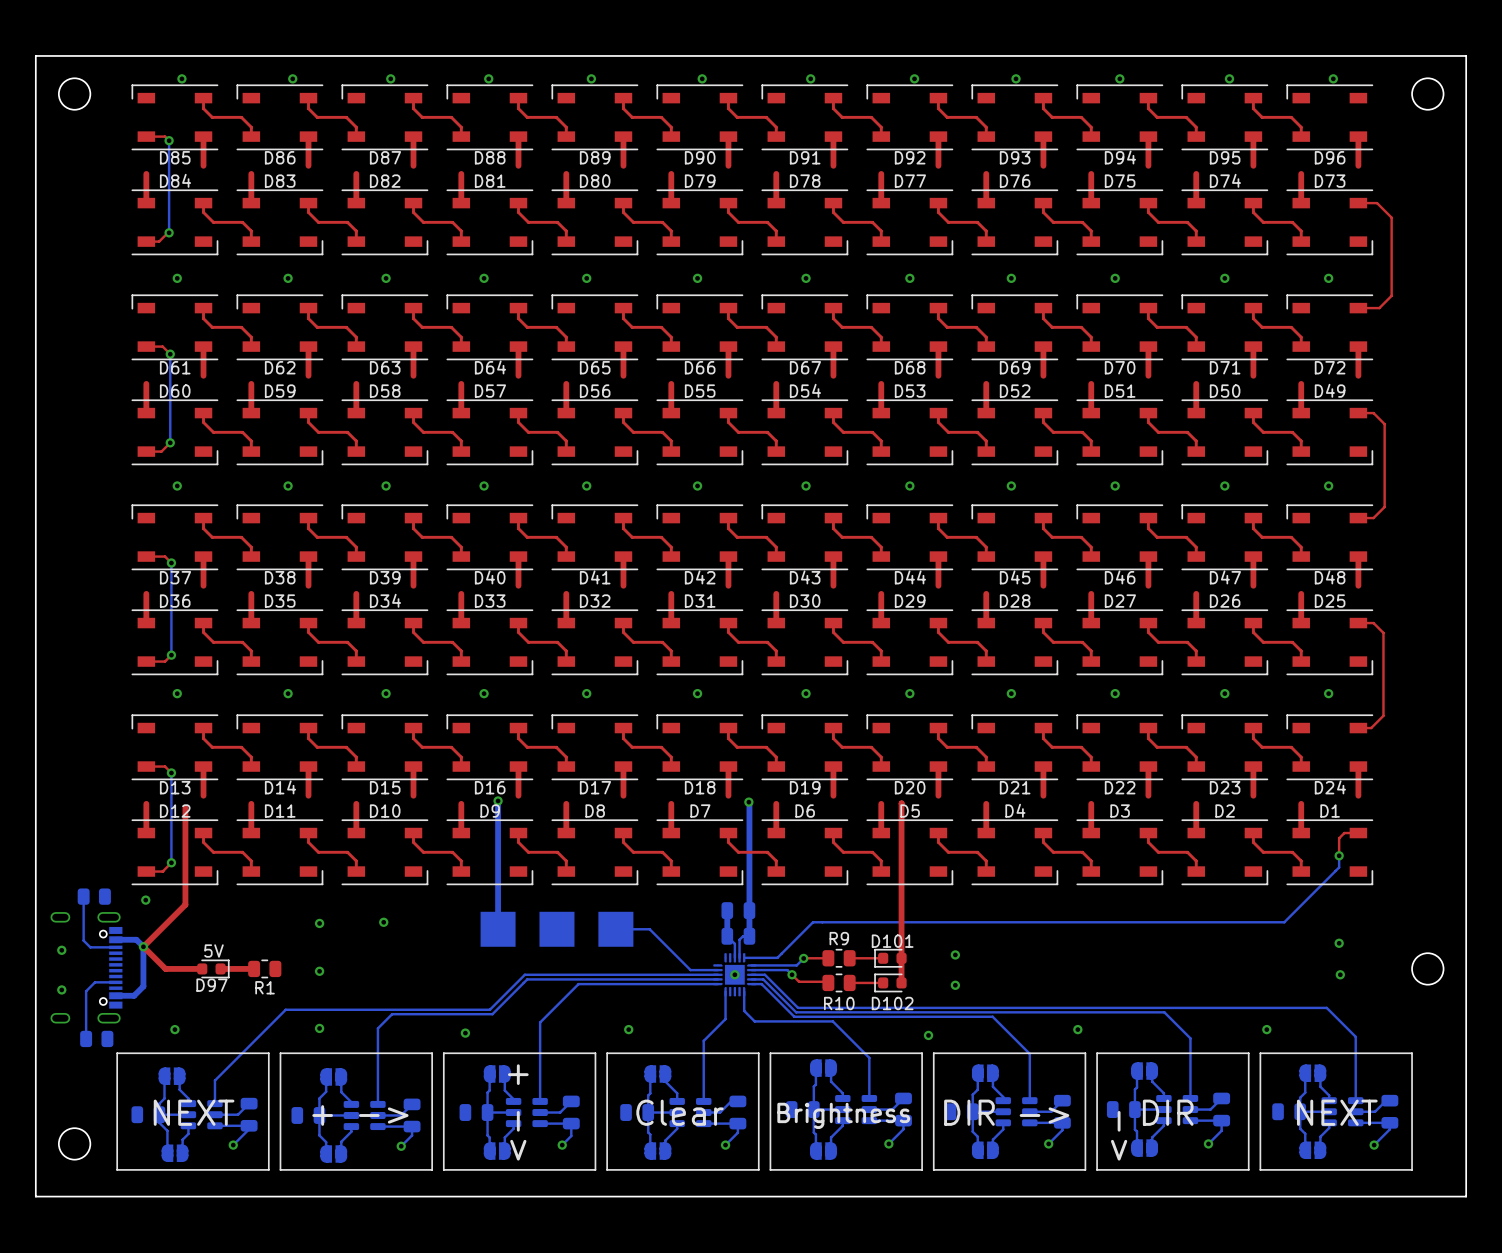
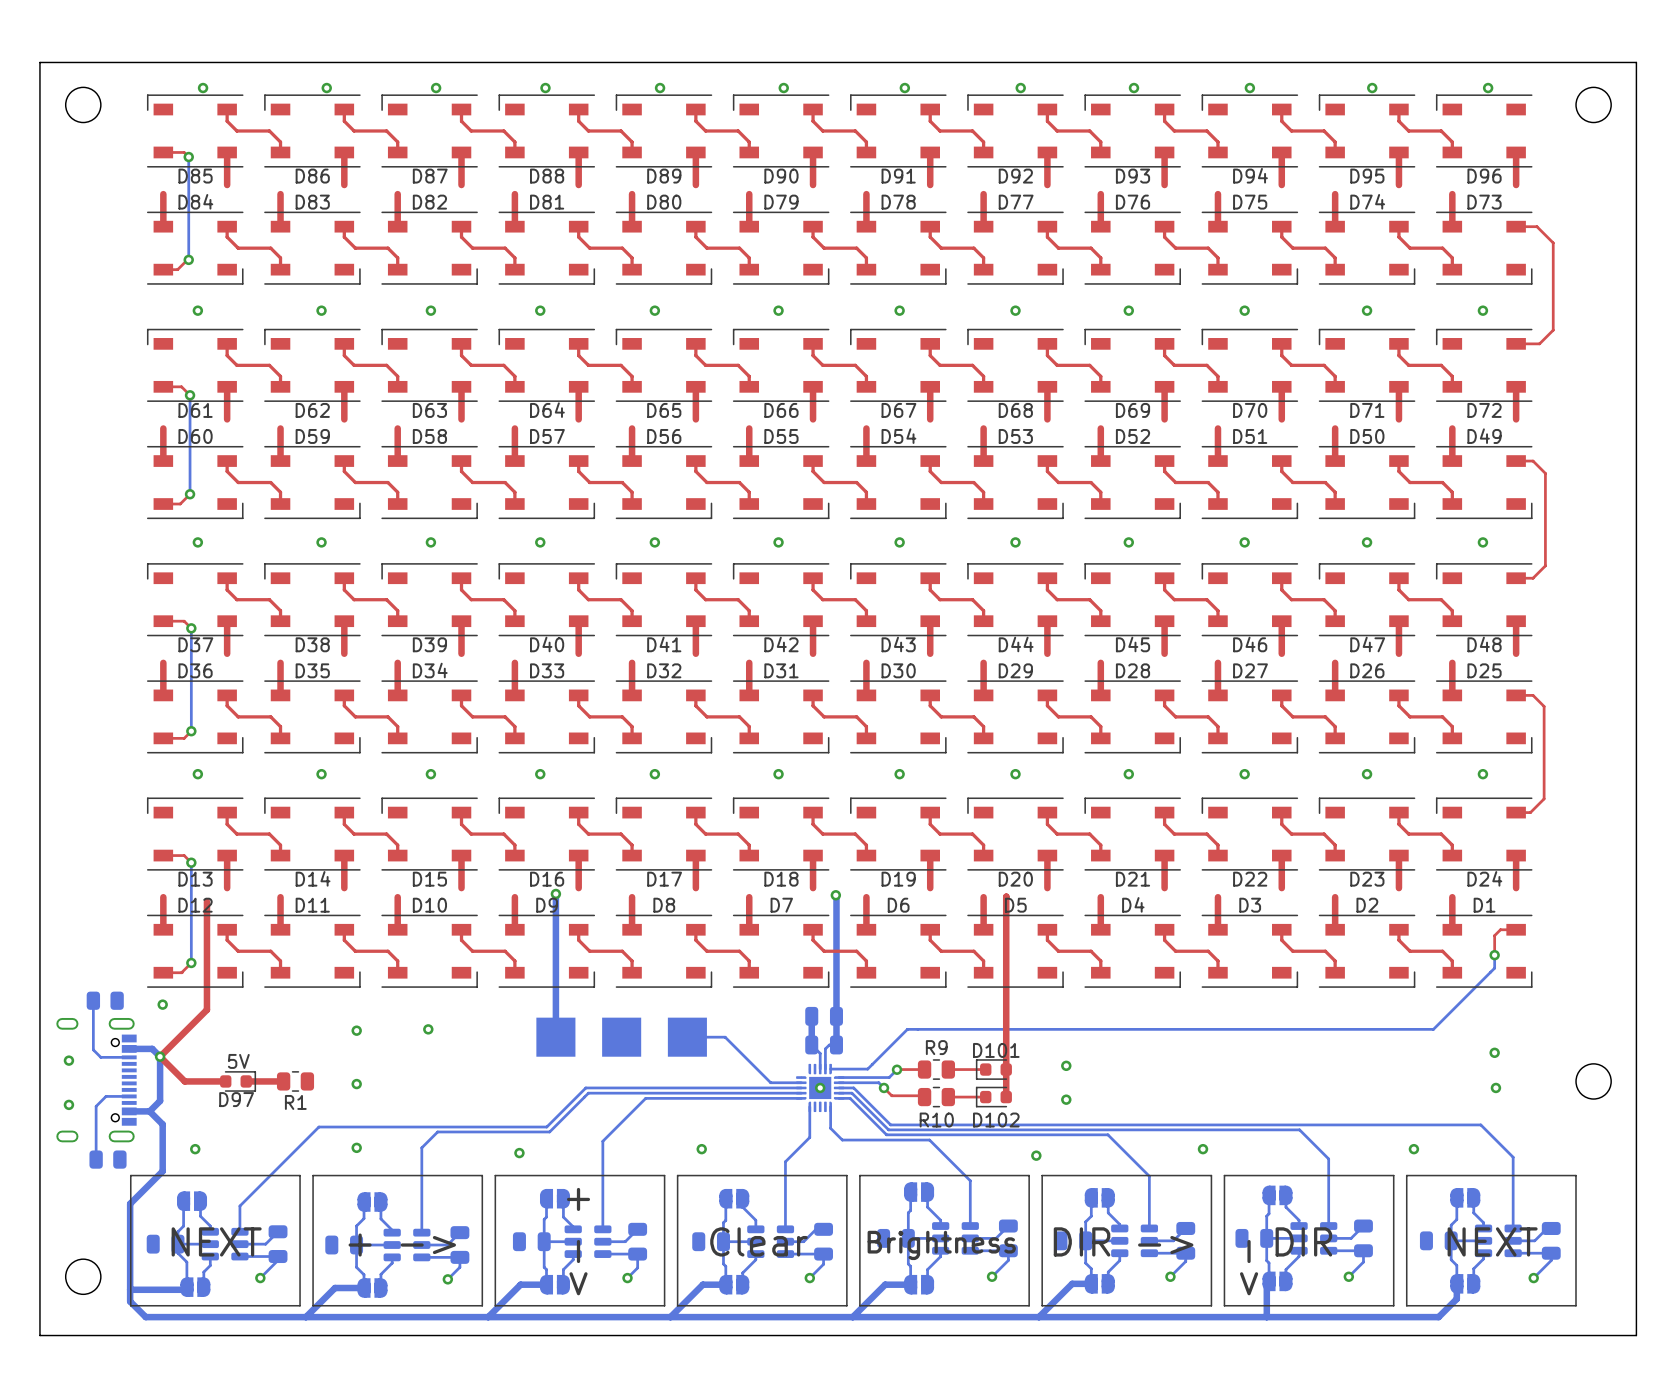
bottom track: none -> (149, 1111) (162, 1124) (162, 1171) (130, 1203) (130, 1301) (145, 1317) (1438, 1317) (1456, 1298) (1456, 1283)
bottom track: none -> (1269, 1281) (1266, 1283) (1266, 1317)
bottom track: none -> (1091, 1283) (1072, 1283) (1038, 1317)
bottom track: none -> (546, 1284) (520, 1284) (488, 1317)
bottom track: none -> (725, 1284) (702, 1284) (670, 1317)
bottom track: none -> (910, 1284) (885, 1284) (852, 1317)
bottom track: none -> (186, 1287) (184, 1289) (130, 1289)
bottom track: none -> (364, 1288) (335, 1288) (305, 1317)

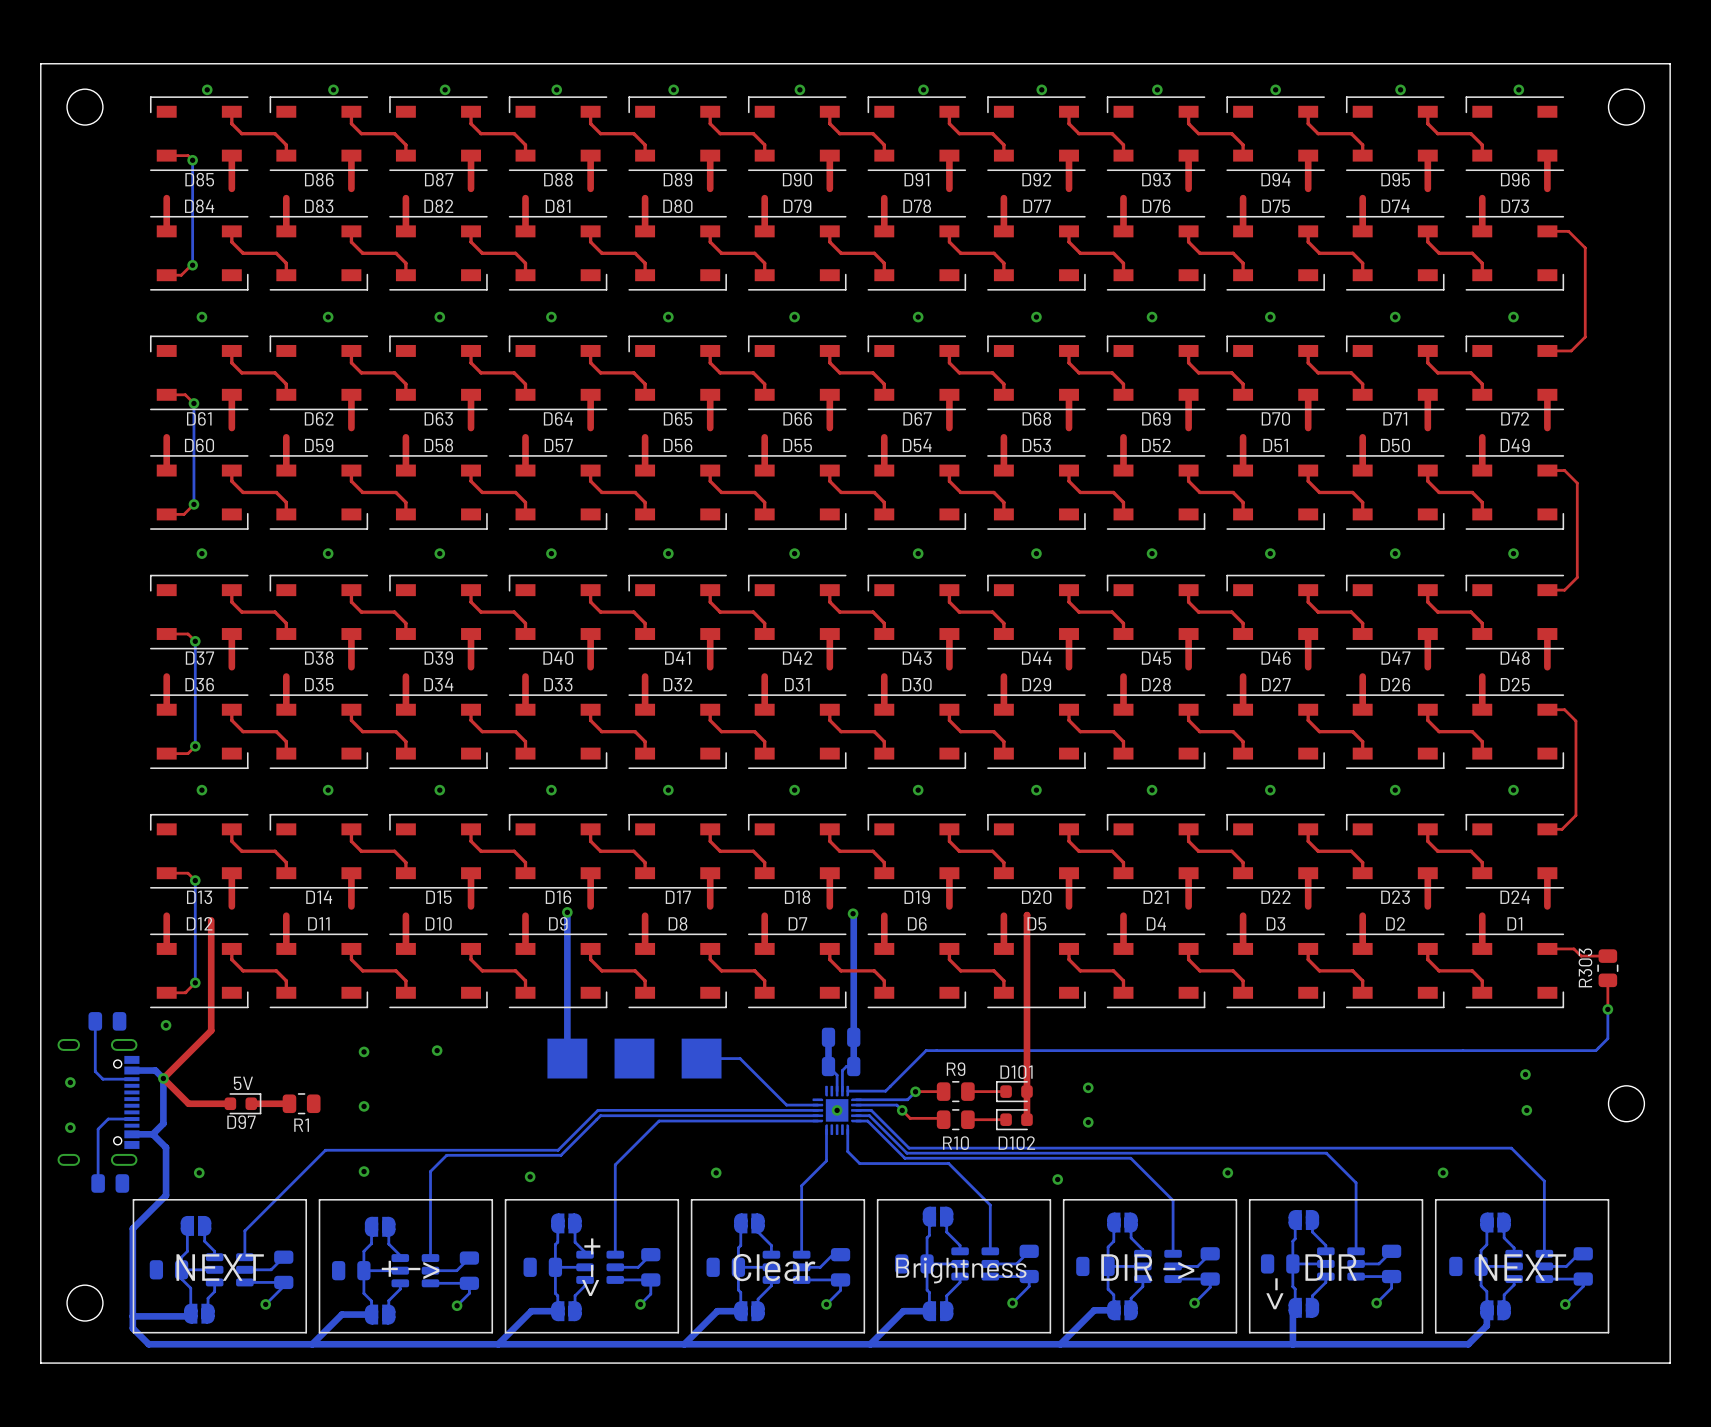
top track: (1516, 929) (1500, 929) (1494, 935) (1494, 955) -> (1547, 948) (1573, 948) (1581, 956) (1607, 956)
R303: none -> (1607, 968)
bottom track: (1494, 955) (1494, 968) (1433, 1029) -> (1607, 1009) (1607, 1038) (1595, 1050) (1463, 1050)
via: (1494, 955) -> none
top track: none -> (1607, 980) (1607, 1009)
via: none -> (1607, 1009)

